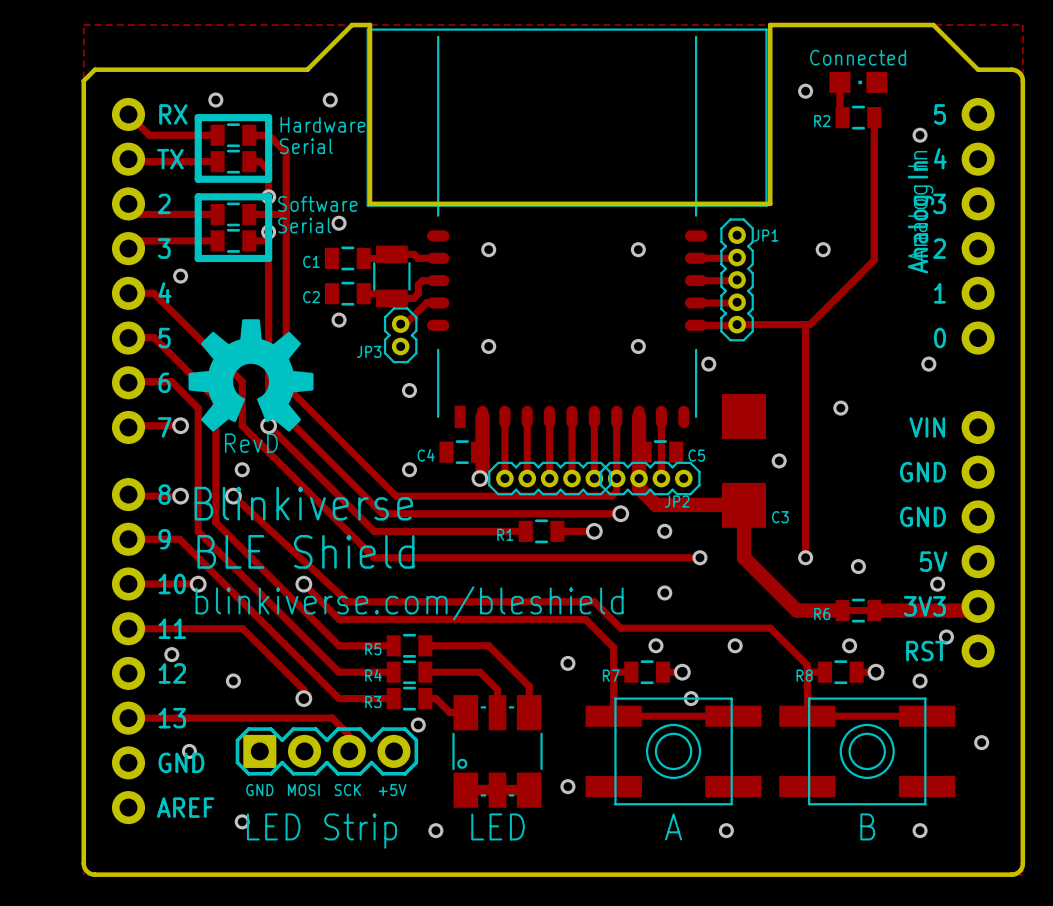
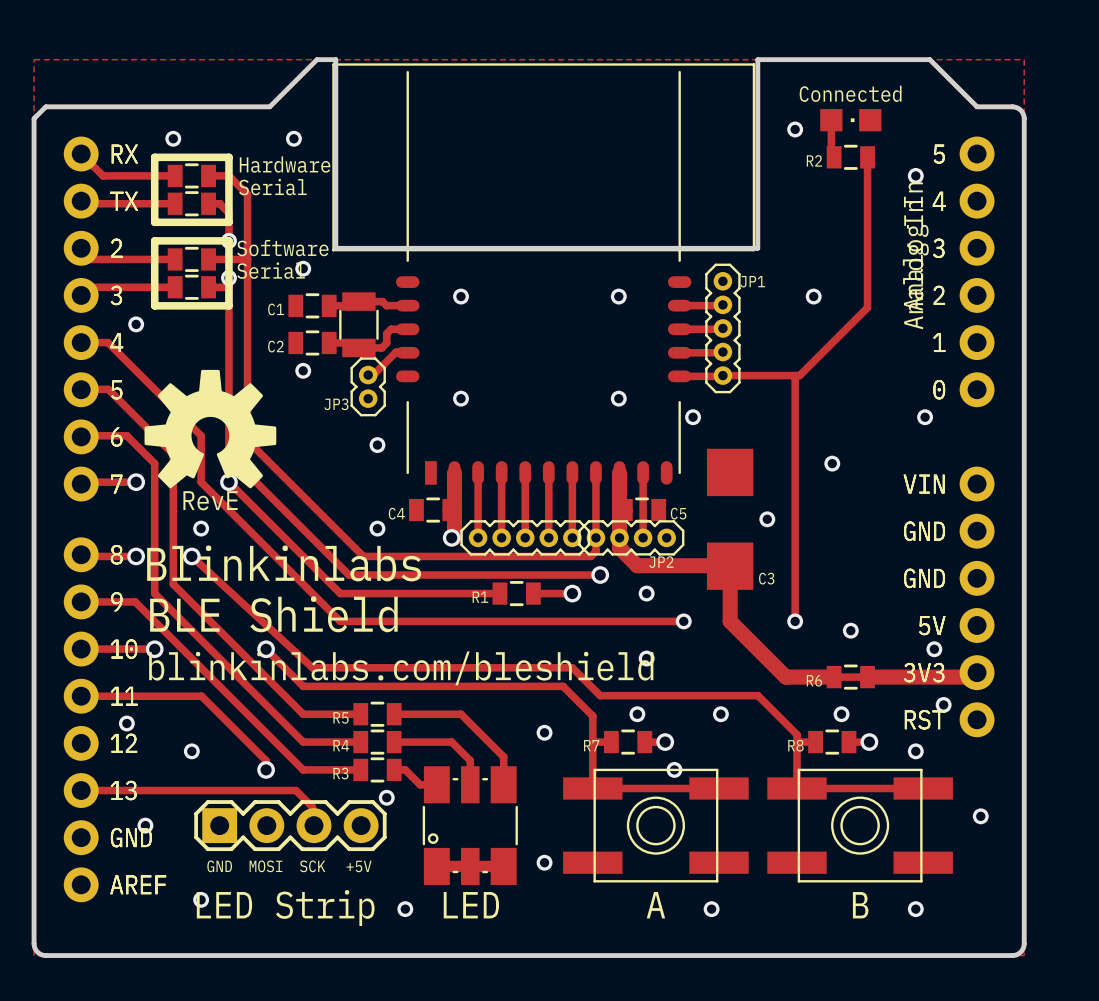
text: RevD (251, 443) -> RevE (210, 500)
text: Blinkiverse (303, 503) -> Blinkinlabs (284, 563)
text: blinkiverse.com/bleshield (409, 603) -> blinkinlabs.com/bleshield (401, 668)

